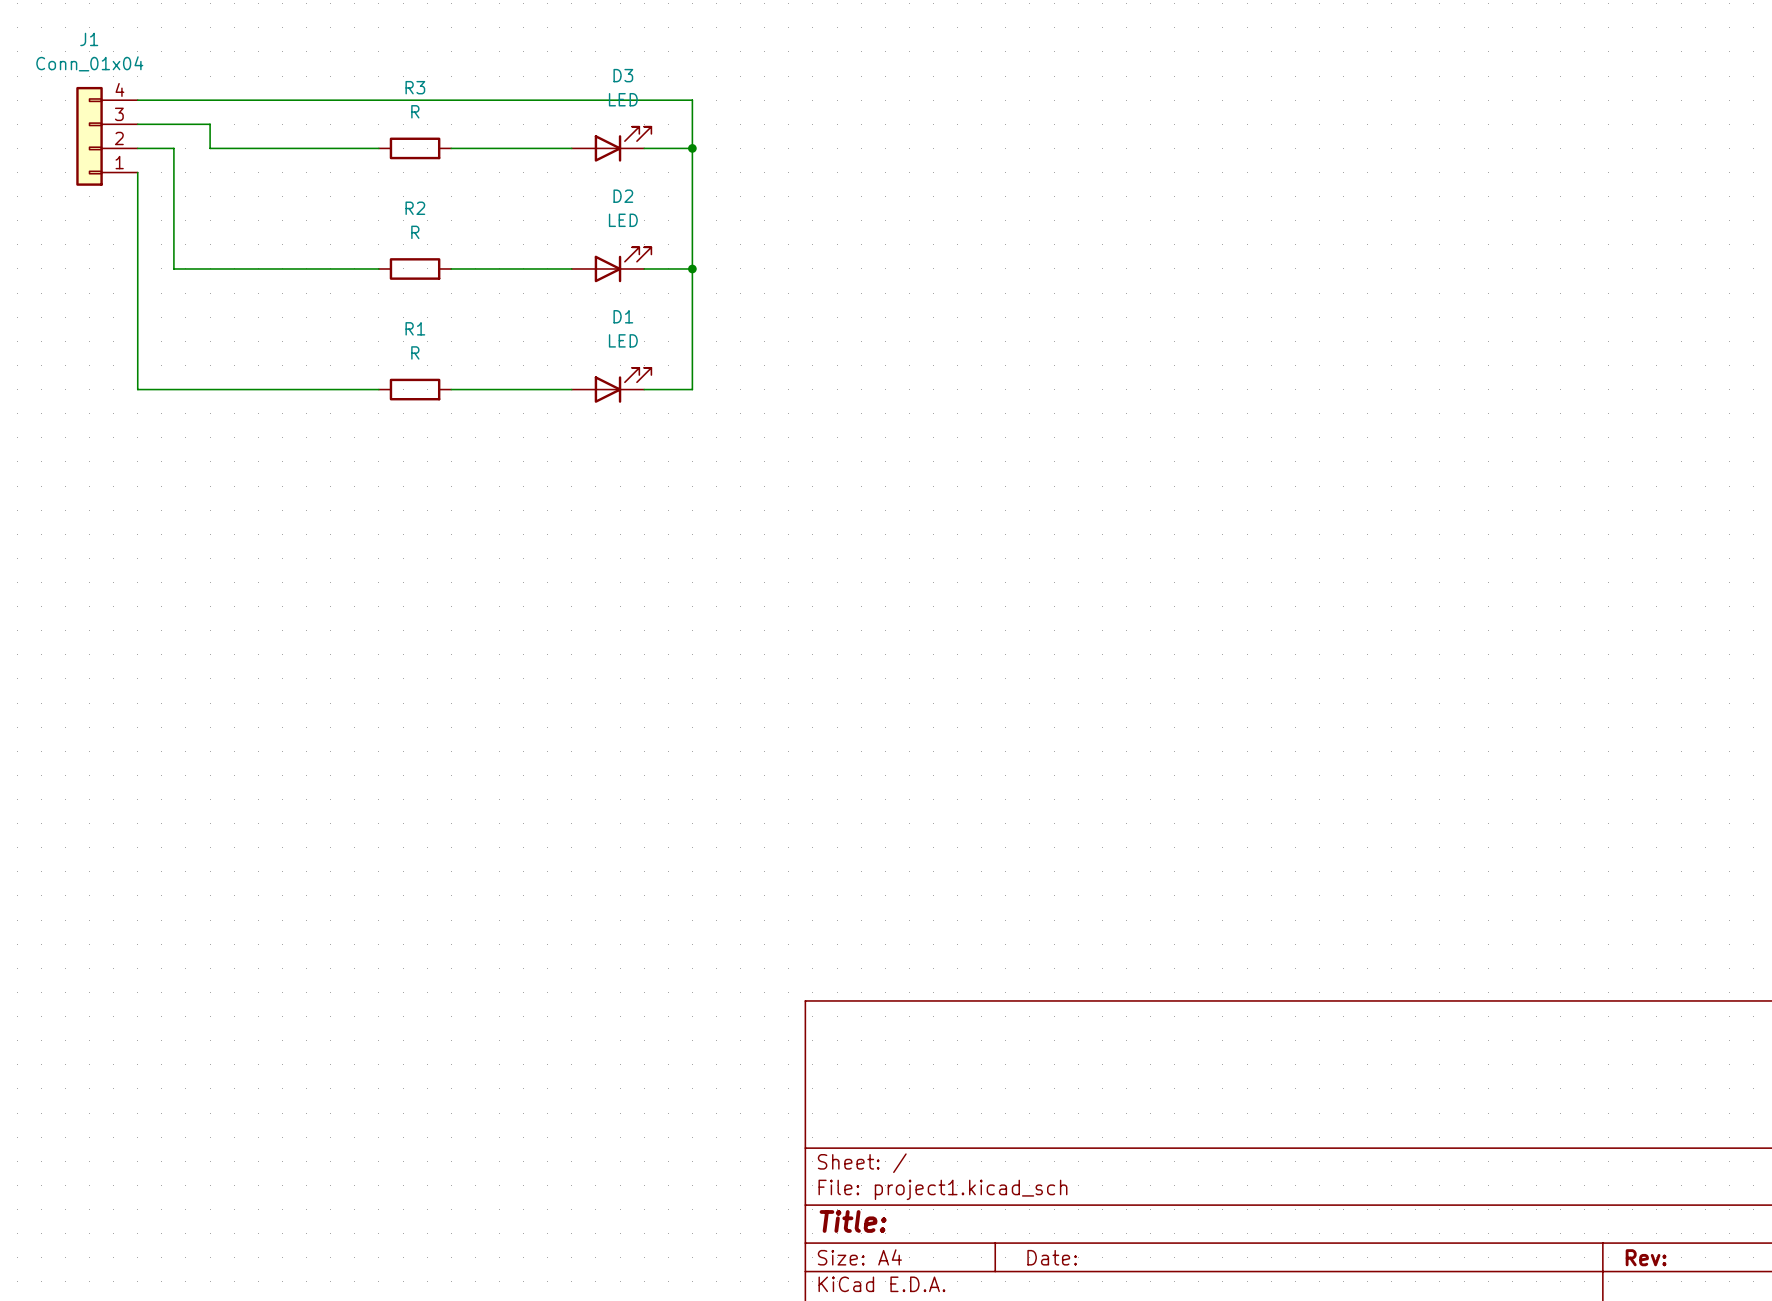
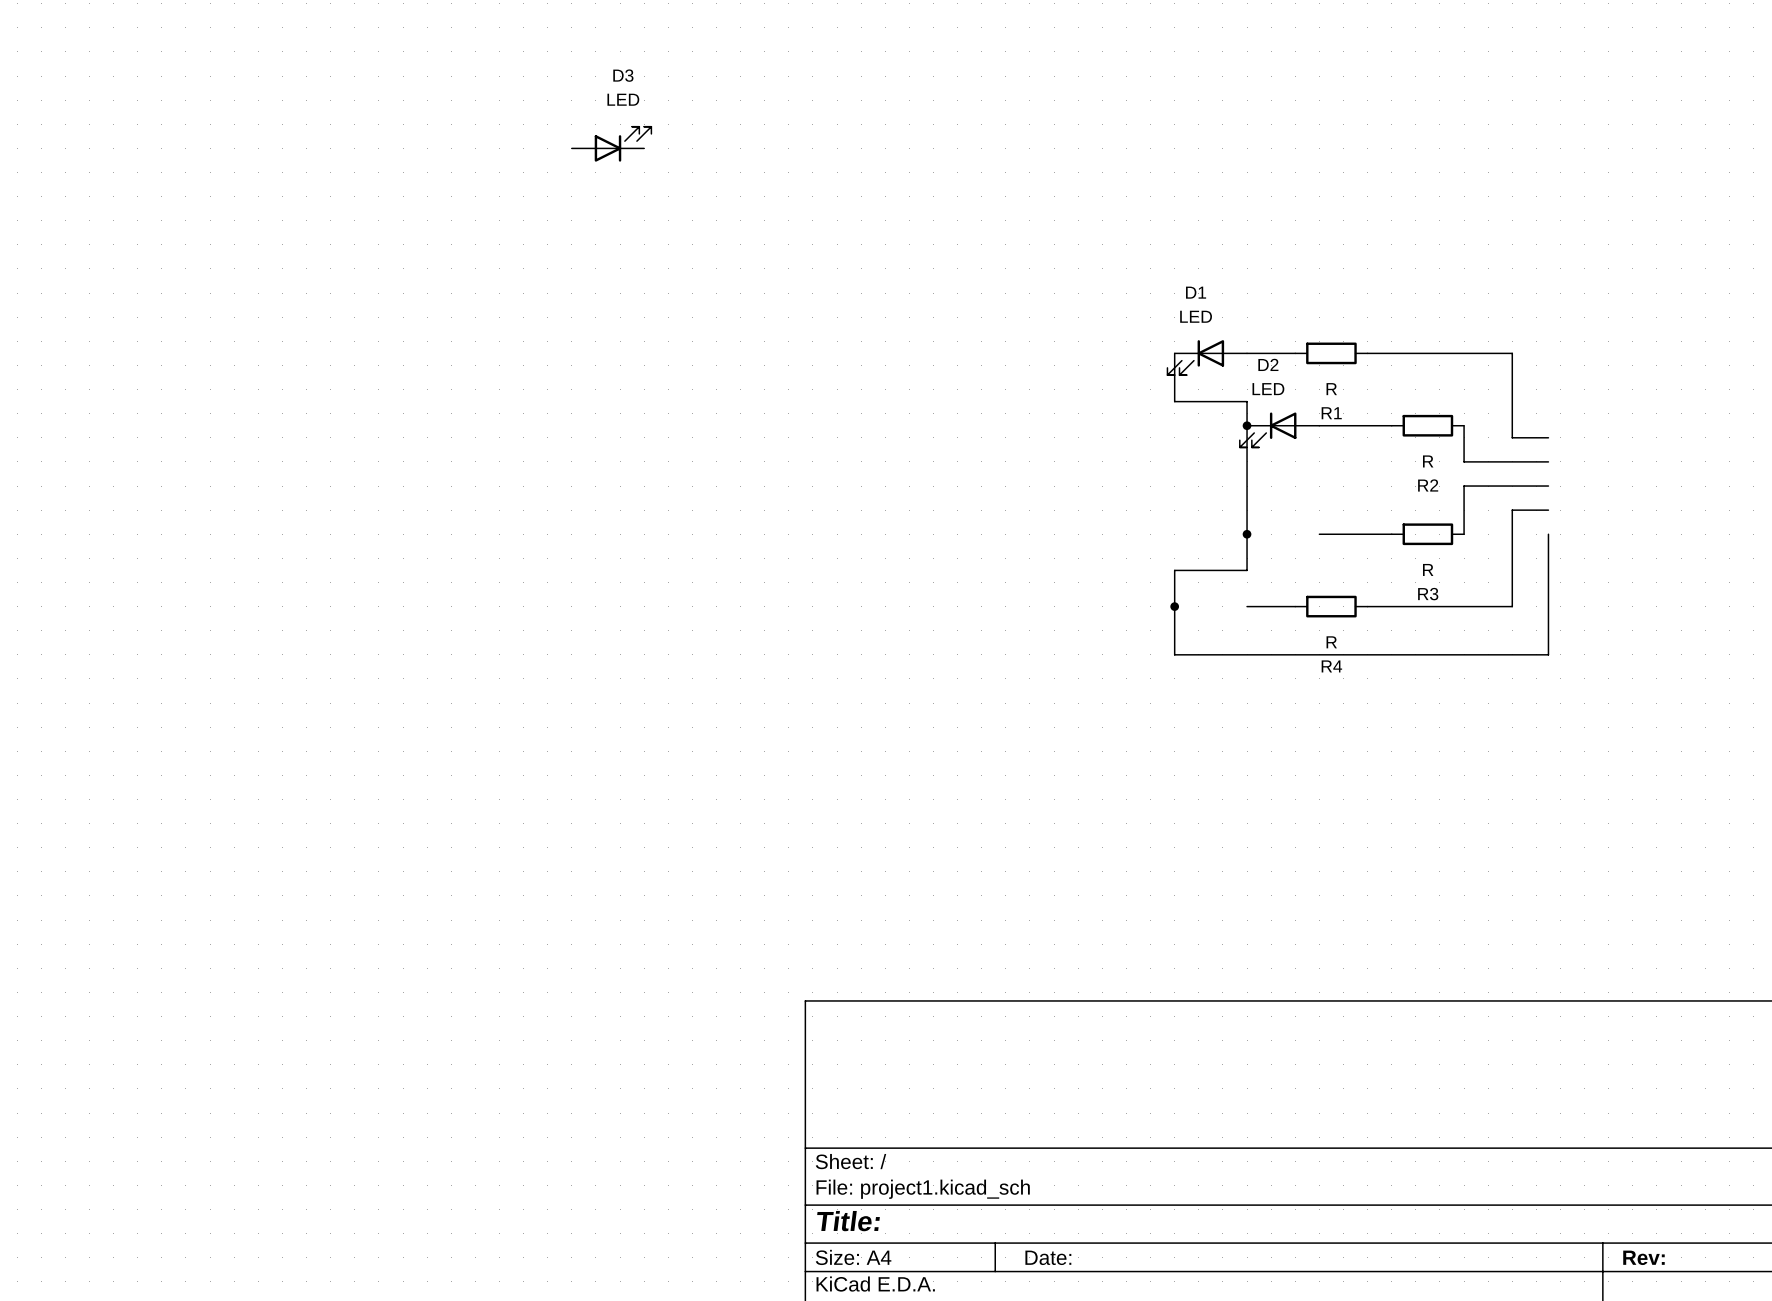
R3 name position: R3 (415, 87) -> R3 (1428, 594)
wire: (137, 100) (692, 100) (692, 389) (644, 389) -> none
R3 value position: R (415, 111) -> R (1428, 569)
wire: (137, 124) (210, 124) (210, 148) (378, 148) -> none
J1: Conn_01x04 (107, 136) -> none
wire: (137, 148) (173, 148) (173, 268) (378, 268) -> none
R3 position: (415, 148) -> (1427, 534)
wire: (451, 148) (571, 148) -> none
wire: (644, 148) (692, 148) -> none
junction: (692, 148) -> none
wire: (137, 172) (137, 389) (378, 389) -> none
D2 name position: D2 (623, 196) -> D2 (1268, 364)
R2 name position: R2 (415, 208) -> R2 (1428, 485)
D2 value position: LED (623, 220) -> LED (1268, 389)
R2 value position: R (415, 232) -> R (1428, 461)
D2 position: (611, 264) -> (1279, 429)
D2 rotation: 0° (623, 264) -> 180° (1268, 429)
R2 position: (415, 268) -> (1427, 425)
wire: (451, 268) (571, 268) -> none
wire: (644, 268) (692, 268) -> none
junction: (692, 268) -> none
D1 name position: D1 (623, 316) -> D1 (1196, 292)
R1 name position: R1 (415, 328) -> R1 (1331, 413)
D1 value position: LED (623, 340) -> LED (1196, 316)
R1 value position: R (415, 352) -> R (1331, 389)
wire: none -> (1174, 353) (1174, 401) (1247, 401) (1247, 570) (1174, 570) (1174, 654) (1548, 654) (1548, 534)
wire: none -> (1247, 353) (1295, 353)
wire: none -> (1367, 353) (1512, 353) (1512, 437) (1548, 437)
D1 position: (611, 385) -> (1207, 357)
D1 rotation: 0° (623, 385) -> 180° (1195, 357)
R1 position: (415, 389) -> (1331, 353)
wire: (451, 389) (571, 389) -> none
junction: none -> (1247, 425)
wire: none -> (1319, 425) (1391, 425)
wire: none -> (1464, 425) (1464, 461) (1548, 461)
wire: none -> (1548, 486) (1464, 486) (1464, 534)
wire: none -> (1548, 510) (1512, 510) (1512, 606) (1367, 606)
junction: none -> (1247, 534)
wire: none -> (1319, 534) (1391, 534)
junction: none -> (1174, 606)
wire: none -> (1247, 606) (1295, 606)
R4: none -> R (1331, 606)

